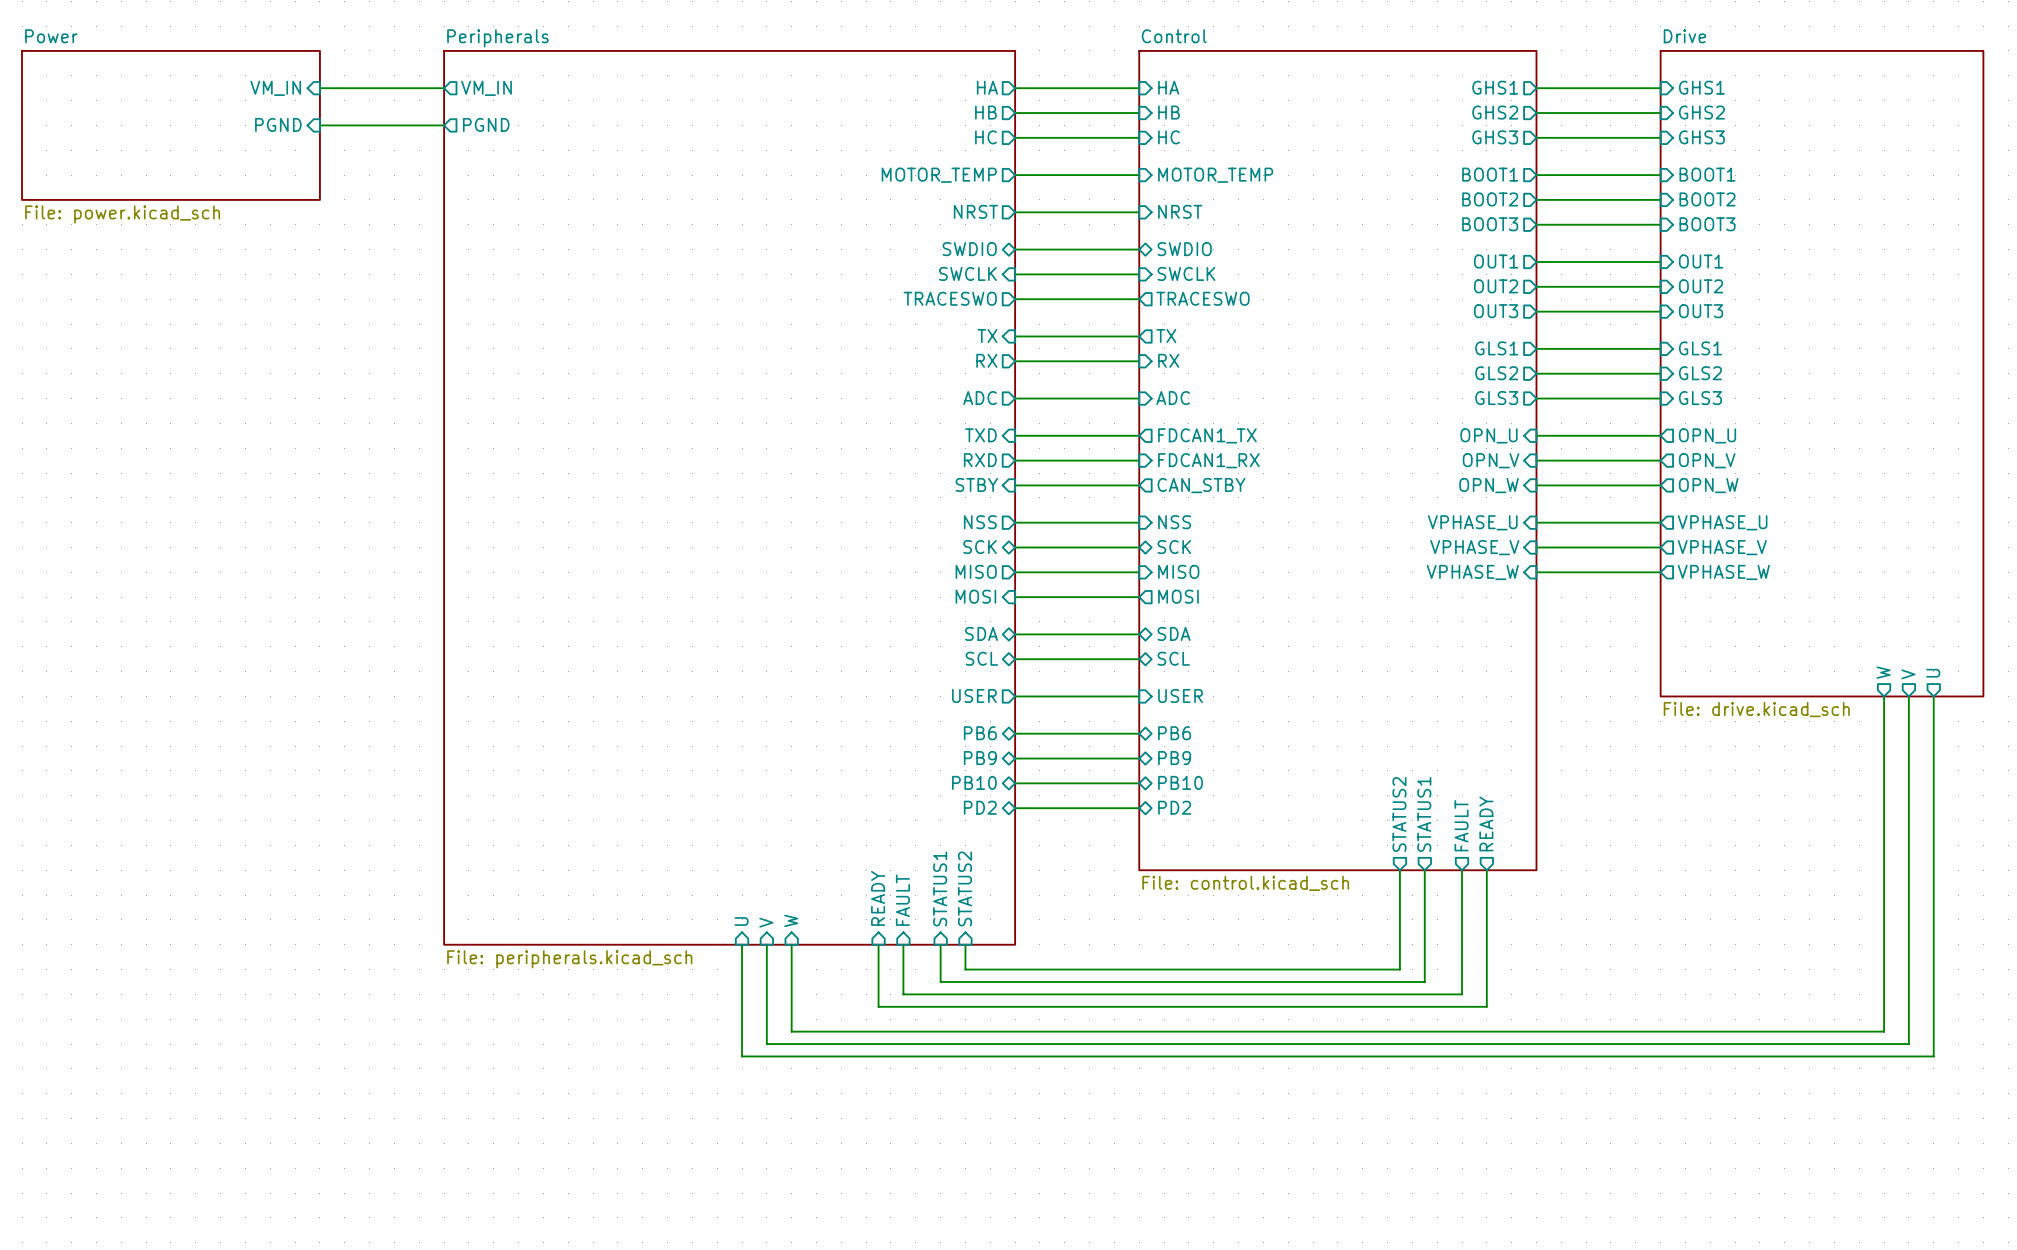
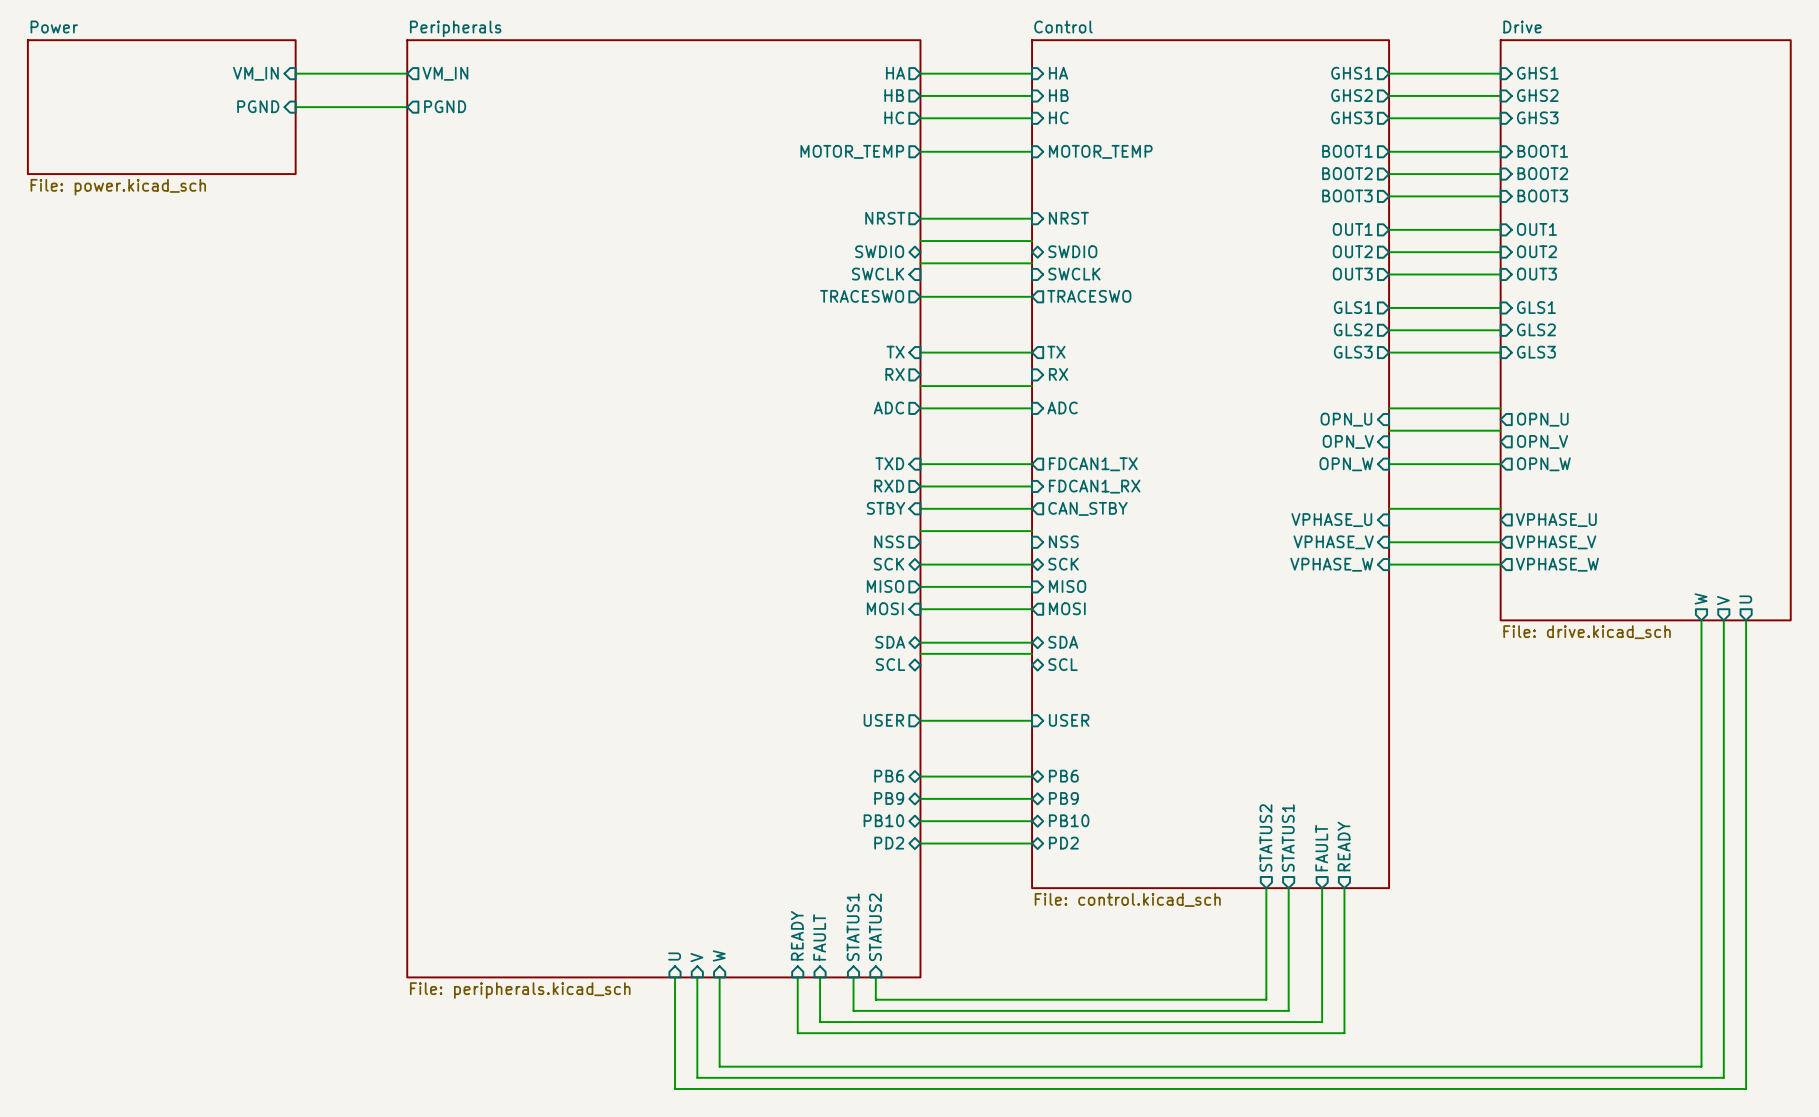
sheet pin: NRST (975, 211) -> none
sheet pin: NRST (1180, 211) -> none
wire: (1015, 212) (1139, 212) -> none
sheet pin shape: bidirectional (969, 249) -> output (885, 218)
sheet pin: SWDIO (969, 249) -> NRST (885, 218)
sheet pin shape: bidirectional (1184, 249) -> input (1068, 218)
sheet pin: SWDIO (1184, 249) -> NRST (1068, 218)
sheet pin position: SWCLK (967, 273) -> SWCLK (878, 274)
sheet pin position: SWCLK (1186, 273) -> SWCLK (1074, 274)
sheet pin: none -> SWDIO (879, 251)
sheet pin: none -> SWDIO (1072, 251)
sheet pin: TRACESWO (950, 298) -> none
sheet pin: TRACESWO (1202, 298) -> none
sheet pin shape: input (987, 336) -> output (862, 296)
sheet pin: TX (987, 336) -> TRACESWO (862, 296)
sheet pin: TX (1166, 336) -> TRACESWO (1089, 296)
sheet pin position: RX (986, 360) -> RX (895, 374)
sheet pin position: RX (1168, 360) -> RX (1058, 374)
wire: (1015, 361) (1139, 361) -> none
sheet pin shape: output (980, 398) -> input (895, 352)
sheet pin: ADC (980, 398) -> TX (895, 352)
sheet pin shape: input (1173, 398) -> output (1056, 352)
sheet pin: ADC (1173, 398) -> TX (1056, 352)
sheet pin: TXD (980, 435) -> none
sheet pin: FDCAN1_TX (1207, 435) -> none
sheet pin position: OPN_U (1489, 435) -> OPN_U (1346, 419)
wire: (1536, 435) (1660, 435) -> (1389, 564) (1500, 564)
sheet pin position: OPN_U (1707, 435) -> OPN_U (1542, 419)
sheet pin: RXD (980, 460) -> ADC (888, 407)
sheet pin: FDCAN1_RX (1208, 460) -> ADC (1062, 407)
sheet Control: File: control.kicad_sch (1337, 460) -> none
sheet pin position: OPN_V (1491, 460) -> OPN_V (1348, 441)
sheet pin position: OPN_V (1707, 460) -> OPN_V (1542, 441)
sheet pin: STBY (976, 484) -> none
wire: (1015, 485) (1139, 485) -> (920, 609) (1032, 609)
sheet pin: CAN_STBY (1201, 485) -> none
sheet pin: OPN_W (1489, 485) -> none
sheet pin: OPN_W (1708, 485) -> none
sheet Peripherals: File: peripherals.kicad_sch (729, 497) -> none
sheet pin shape: output (980, 522) -> input (889, 463)
sheet pin: NSS (980, 522) -> TXD (889, 463)
sheet pin shape: input (1174, 522) -> output (1093, 464)
sheet pin: NSS (1174, 522) -> FDCAN1_TX (1093, 464)
sheet Control: none -> File: control.kicad_sch (1210, 464)
sheet pin: VPHASE_U (1472, 522) -> OPN_W (1346, 464)
sheet pin: VPHASE_U (1722, 522) -> OPN_W (1543, 464)
sheet pin shape: bidirectional (980, 547) -> output (889, 486)
sheet pin: SCK (980, 547) -> RXD (889, 486)
sheet pin shape: bidirectional (1174, 547) -> input (1094, 486)
sheet pin: SCK (1174, 547) -> FDCAN1_RX (1094, 486)
sheet pin position: VPHASE_V (1474, 547) -> VPHASE_V (1333, 542)
wire: (1536, 547) (1660, 547) -> (1389, 542) (1500, 542)
sheet pin position: VPHASE_V (1722, 547) -> VPHASE_V (1556, 542)
sheet pin shape: output (976, 571) -> input (886, 508)
sheet pin: MISO (976, 571) -> STBY (886, 508)
sheet pin shape: input (1178, 571) -> output (1088, 508)
sheet pin: MISO (1178, 571) -> CAN_STBY (1088, 508)
sheet Peripherals: none -> File: peripherals.kicad_sch (663, 508)
sheet pin position: VPHASE_W (1472, 572) -> VPHASE_W (1331, 564)
sheet pin position: VPHASE_W (1723, 572) -> VPHASE_W (1557, 564)
sheet pin: none -> VPHASE_U (1331, 520)
sheet pin: none -> VPHASE_U (1556, 520)
sheet pin position: MOSI (975, 596) -> MOSI (885, 608)
sheet pin position: MOSI (1178, 596) -> MOSI (1067, 608)
sheet pin: none -> NSS (889, 541)
sheet pin: none -> NSS (1063, 541)
sheet pin: SDA (981, 633) -> SCK (888, 564)
sheet pin: SDA (1174, 633) -> SCK (1063, 564)
sheet pin shape: bidirectional (981, 658) -> output (885, 586)
sheet pin: SCL (981, 658) -> MISO (885, 586)
sheet pin shape: bidirectional (1173, 658) -> input (1067, 586)
sheet pin: SCL (1173, 658) -> MISO (1067, 586)
sheet pin: USER (974, 696) -> none
wire: (1015, 696) (1139, 696) -> (920, 798) (1032, 798)
sheet pin: USER (1180, 696) -> none
sheet pin: none -> SDA (890, 642)
sheet pin: none -> SDA (1063, 642)
wire: none -> (920, 642) (1032, 642)
sheet pin: PB6 (980, 733) -> none
sheet pin: PB6 (1174, 733) -> none
sheet pin: none -> SCL (890, 664)
sheet pin: none -> SCL (1063, 664)
sheet pin: PB9 (980, 758) -> none
wire: (1015, 758) (1139, 758) -> (920, 821) (1032, 821)
sheet pin: PB9 (1174, 758) -> none
sheet pin: PB10 (974, 782) -> none
sheet pin: PB10 (1180, 782) -> none
wire: (1015, 783) (1139, 783) -> (920, 776) (1032, 776)
sheet pin shape: bidirectional (980, 807) -> output (883, 720)
sheet pin: PD2 (980, 807) -> USER (883, 720)
sheet pin shape: bidirectional (1174, 807) -> input (1069, 720)
sheet pin: PD2 (1174, 807) -> USER (1069, 720)
sheet pin position: STATUS2 (1399, 814) -> STATUS2 (1265, 838)
sheet pin position: STATUS1 (1424, 814) -> STATUS1 (1288, 838)
sheet pin position: READY (1486, 823) -> READY (1344, 846)
sheet pin position: FAULT (1461, 825) -> FAULT (1321, 848)
sheet pin: none -> PB6 (889, 776)
sheet pin: none -> PB6 (1063, 776)
wire: (1399, 870) (1399, 969) (965, 969) (965, 944) -> none
wire: (1424, 870) (1424, 981) (940, 981) (940, 944) -> none
wire: (1462, 870) (1462, 994) (903, 994) (903, 944) -> none
wire: (1486, 870) (1486, 994) -> none
sheet pin position: STATUS1 (940, 888) -> STATUS1 (853, 927)
sheet pin position: STATUS2 (964, 888) -> STATUS2 (875, 927)
sheet pin: none -> PB9 (889, 798)
sheet pin: none -> PB9 (1063, 798)
sheet pin position: READY (878, 898) -> READY (797, 935)
sheet pin position: FAULT (902, 900) -> FAULT (819, 937)
sheet pin: none -> PB10 (883, 820)
sheet pin: none -> PB10 (1069, 820)
sheet pin position: W (791, 920) -> W (719, 955)
sheet pin position: U (741, 921) -> U (674, 956)
sheet pin position: V (766, 922) -> V (696, 957)
wire: (742, 944) (742, 1056) (1933, 1056) -> (675, 977) (675, 1088) (1746, 1088) (1746, 943)
wire: (766, 944) (766, 1044) (1908, 1044) -> (697, 977) (697, 1077) (1723, 1077) (1723, 932)
wire: (791, 944) (791, 1031) (1884, 1031) -> (719, 977) (719, 1066) (1701, 1066) (1701, 921)
wire: (878, 944) (878, 1006) (1486, 1006) -> (797, 977) (797, 1033) (1344, 1033) (1344, 899)
sheet pin: none -> PD2 (889, 843)
wire: none -> (920, 843) (1032, 843)
sheet pin: none -> PD2 (1063, 843)
wire: none -> (1266, 888) (1266, 999) (875, 999) (875, 977)
wire: none -> (1288, 888) (1288, 1010) (853, 1010) (853, 977)
wire: none -> (1322, 888) (1322, 1022) (820, 1022) (820, 977)

